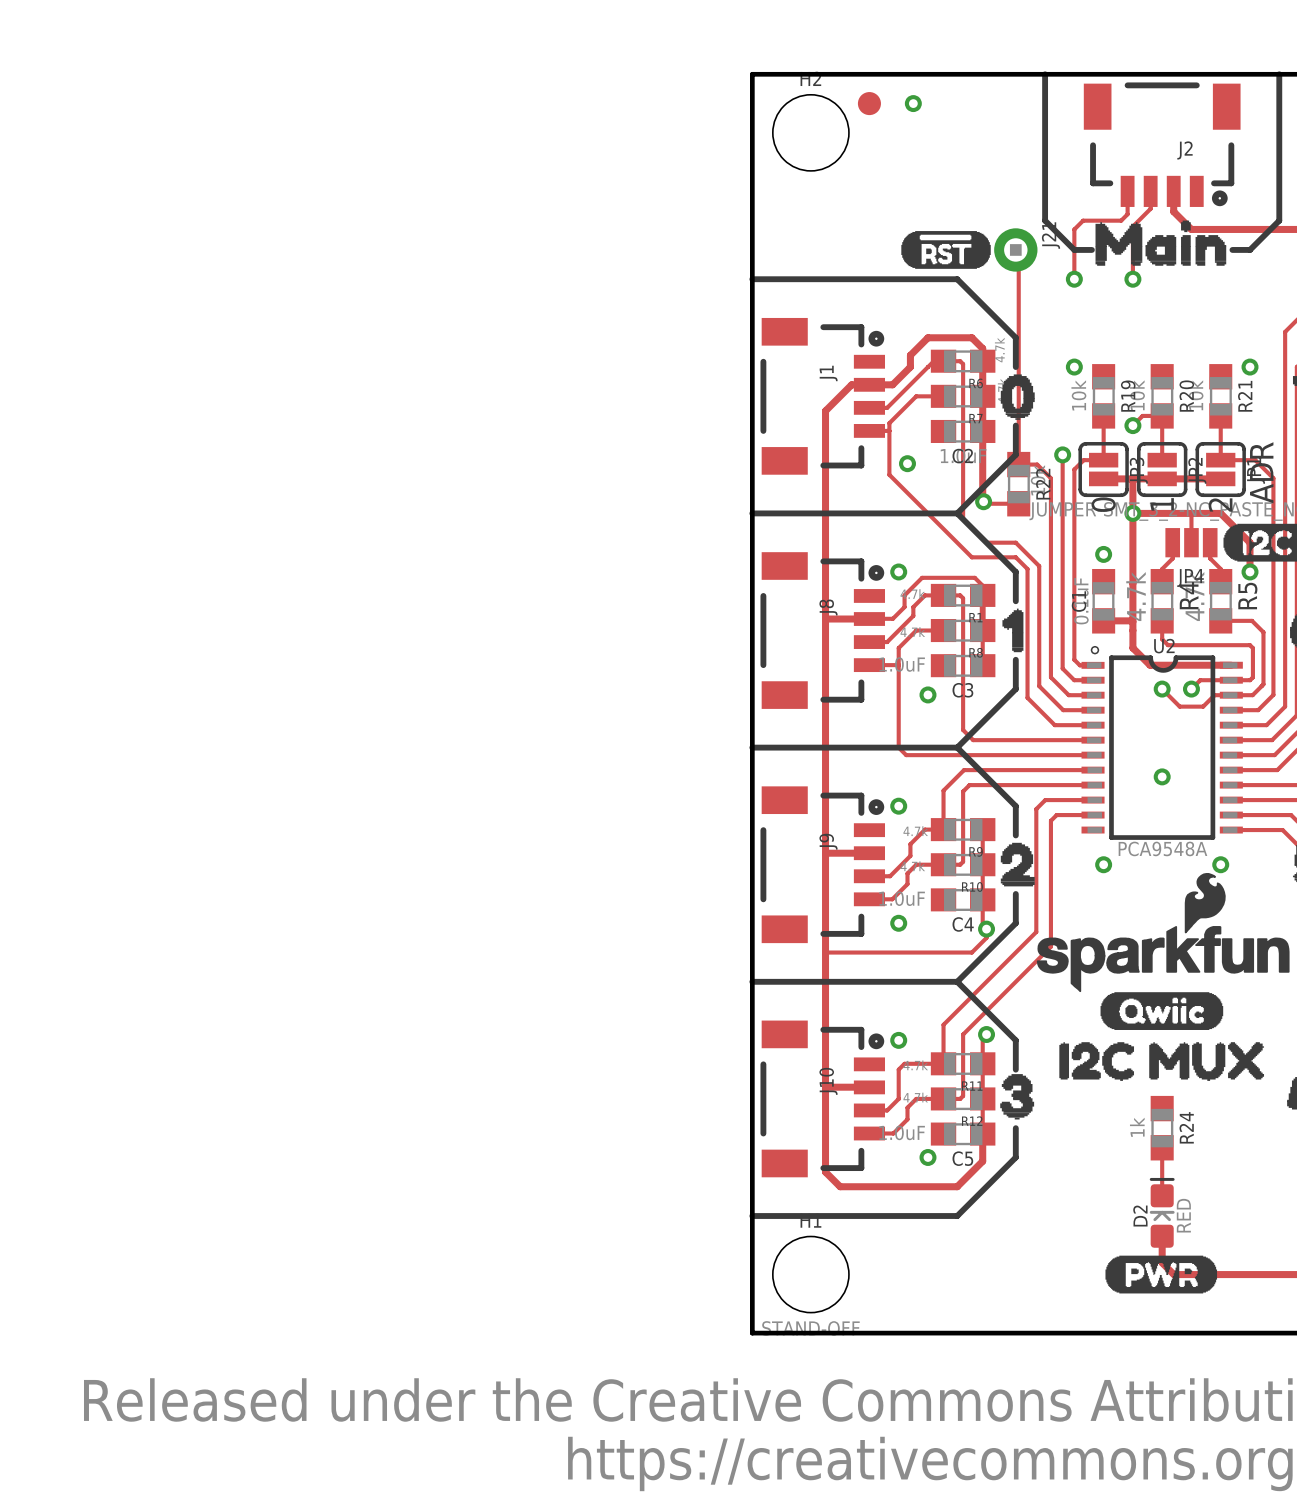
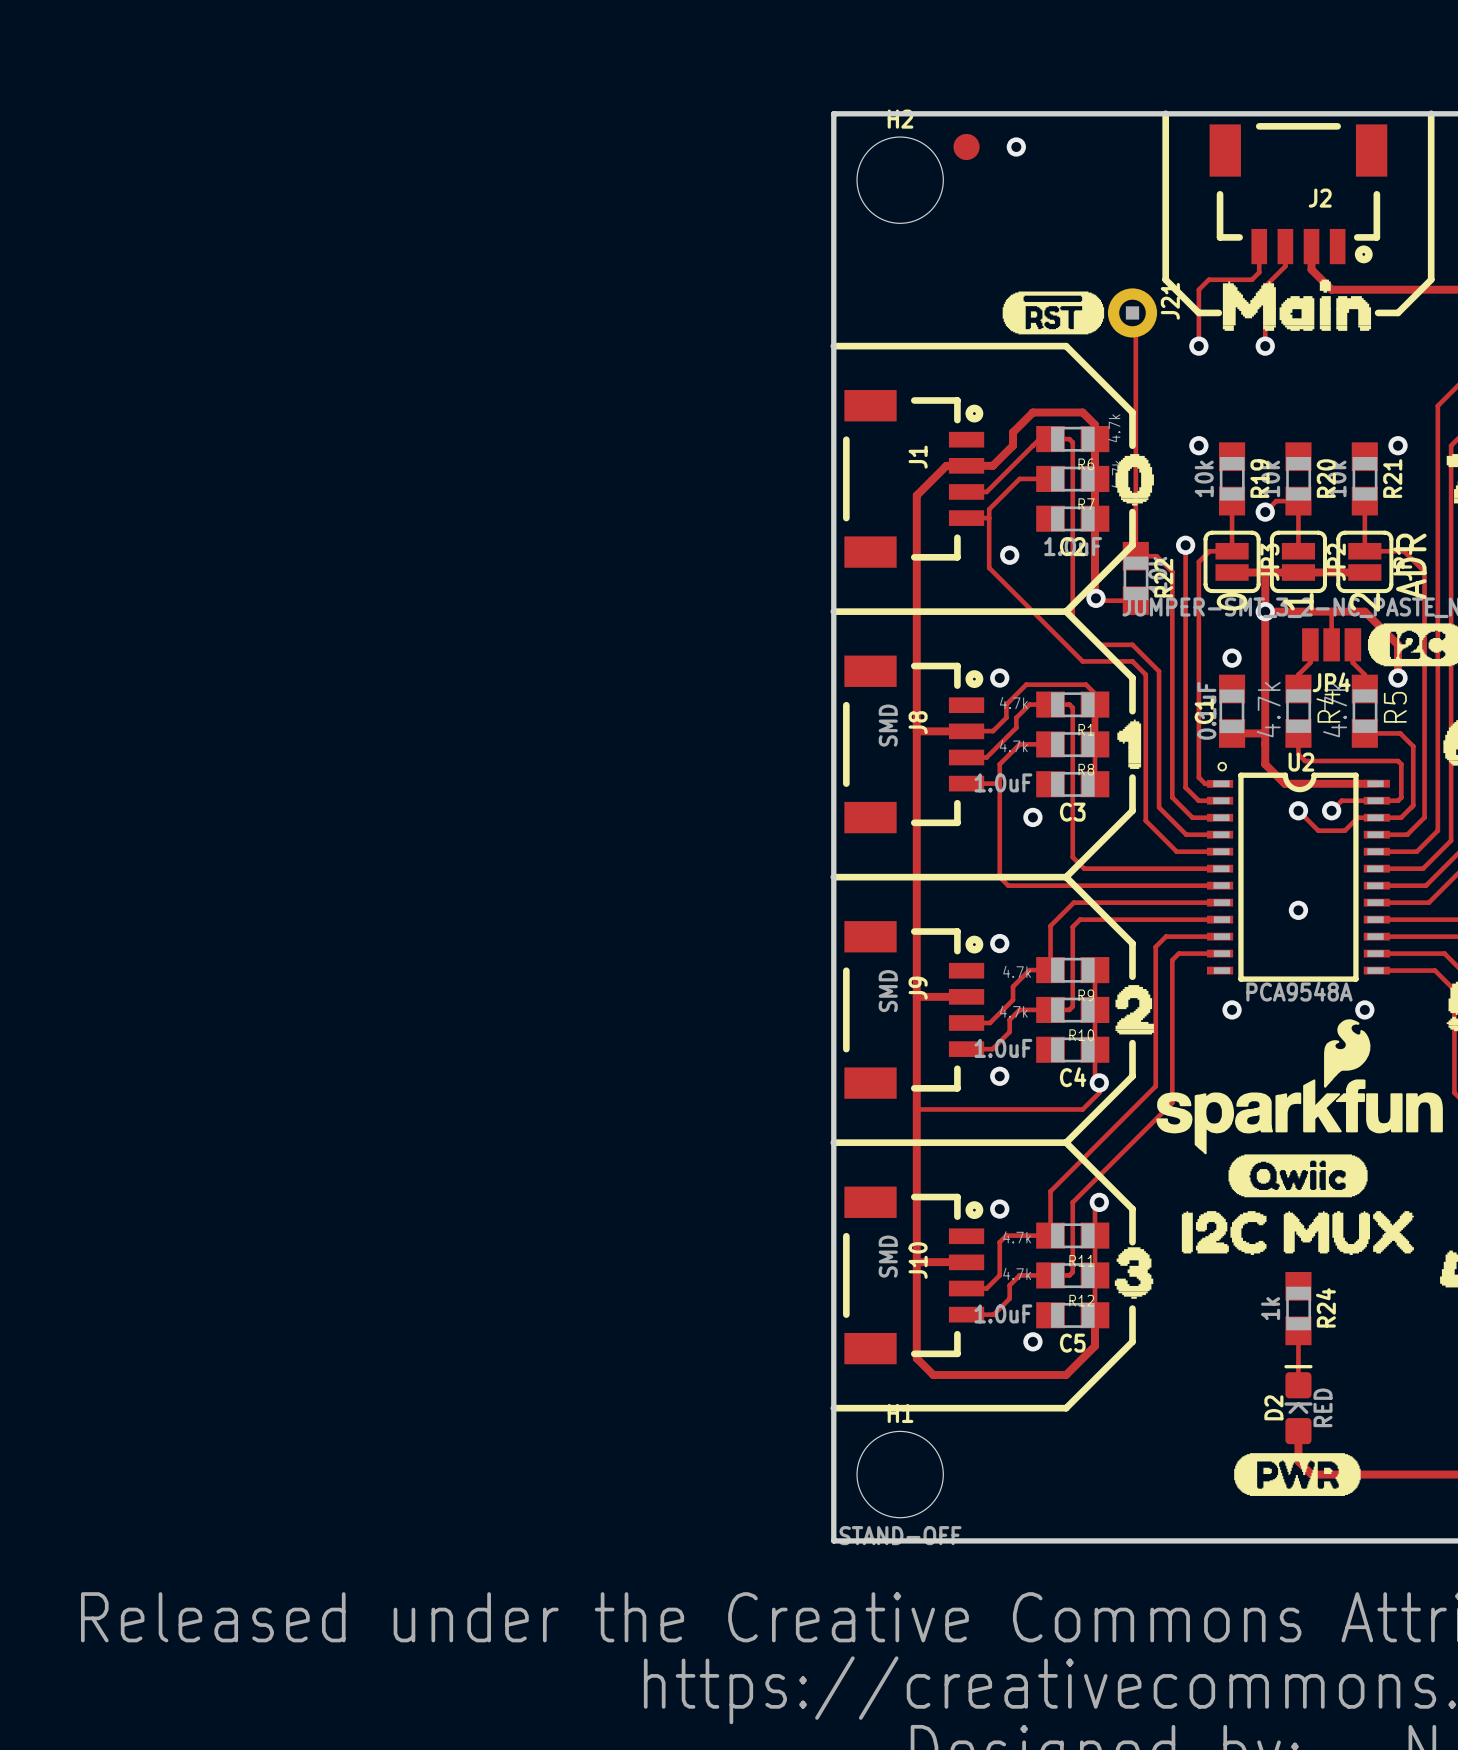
J8 value: none -> SMD (888, 725)
J9 value: none -> SMD (888, 991)
J10 value: none -> SMD (888, 1256)

